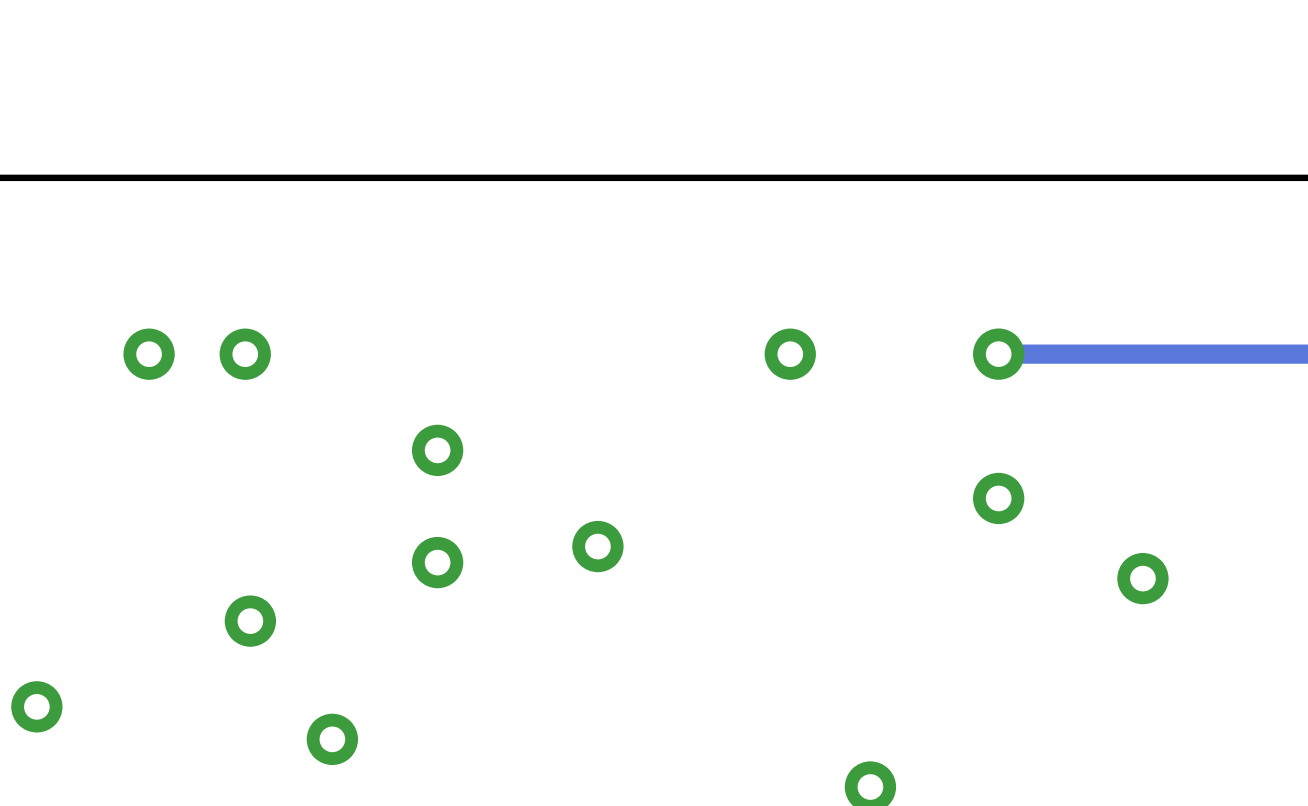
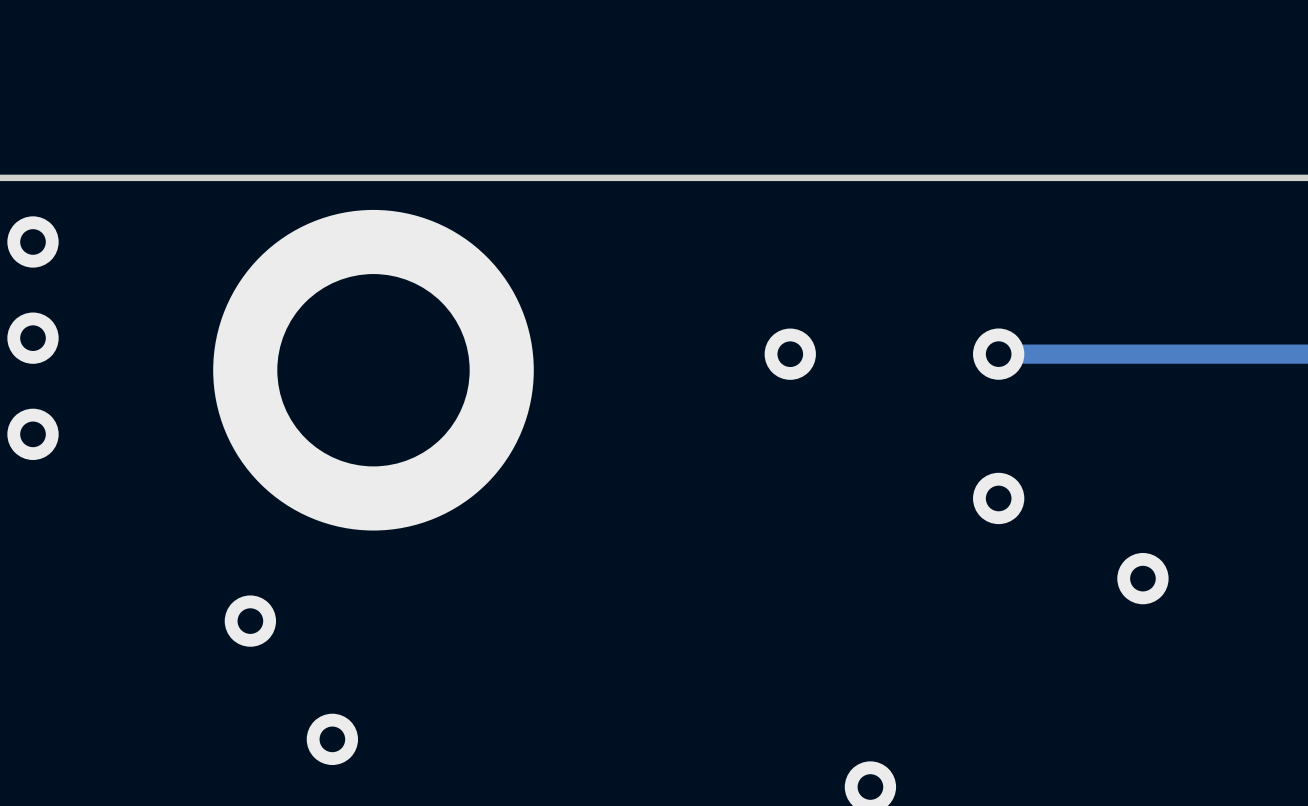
via: none -> (33, 241)
via: none -> (33, 338)
via: (149, 354) -> none
via: (245, 354) -> none
via: none -> (373, 370)
via: none -> (33, 434)
via: (437, 450) -> none
via: (597, 546) -> none
via: (437, 562) -> none
via: (36, 706) -> none

